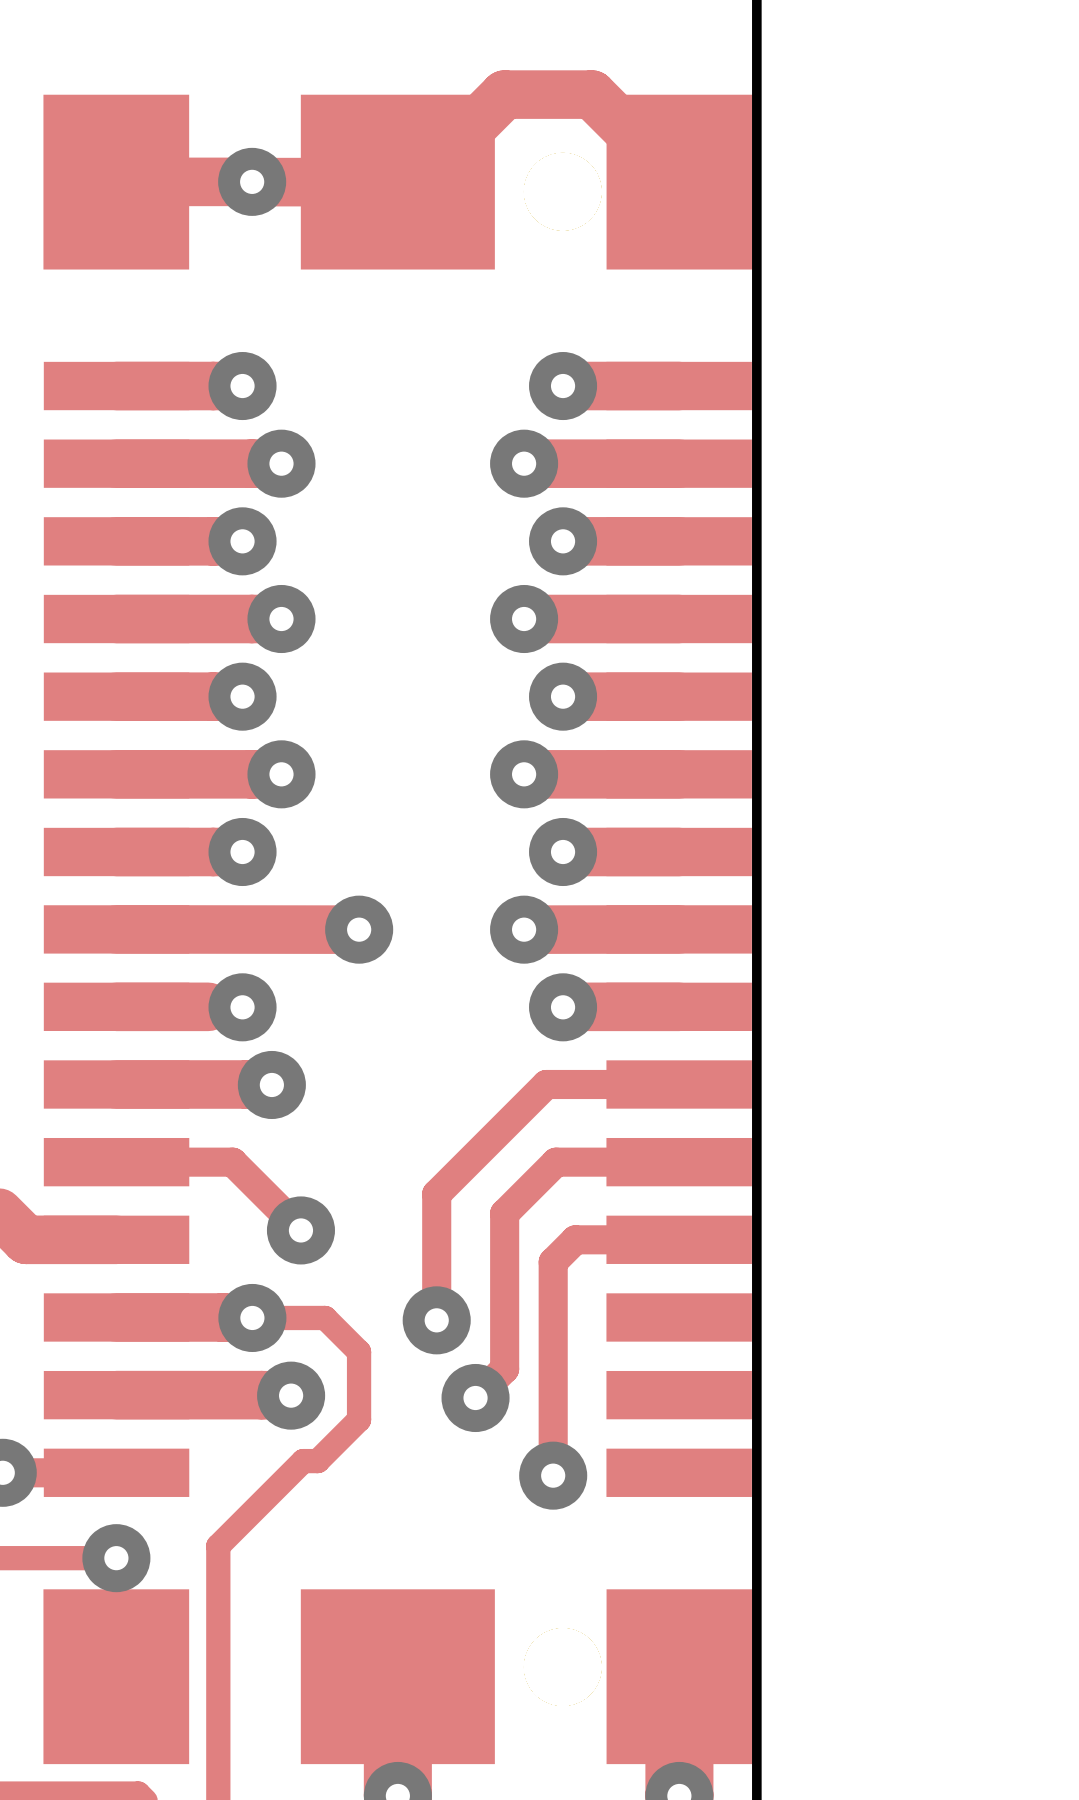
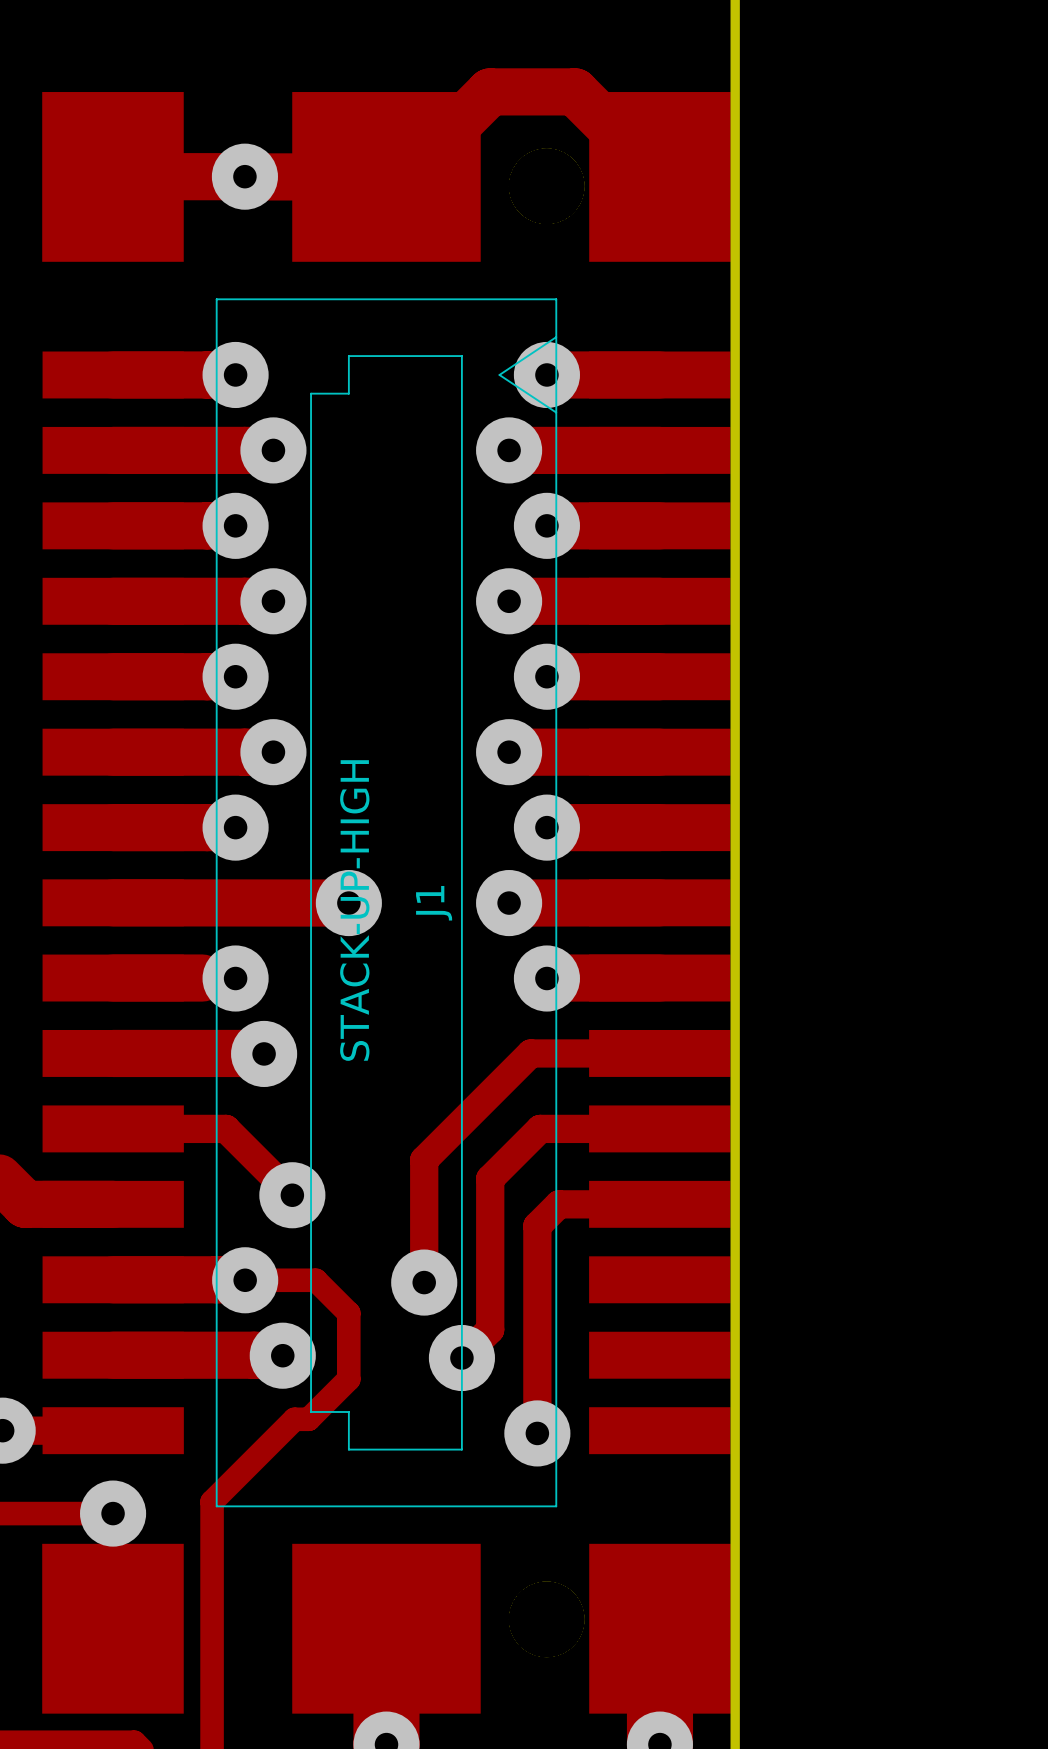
J1: none -> STACK-UP-HIGH (386, 902)

